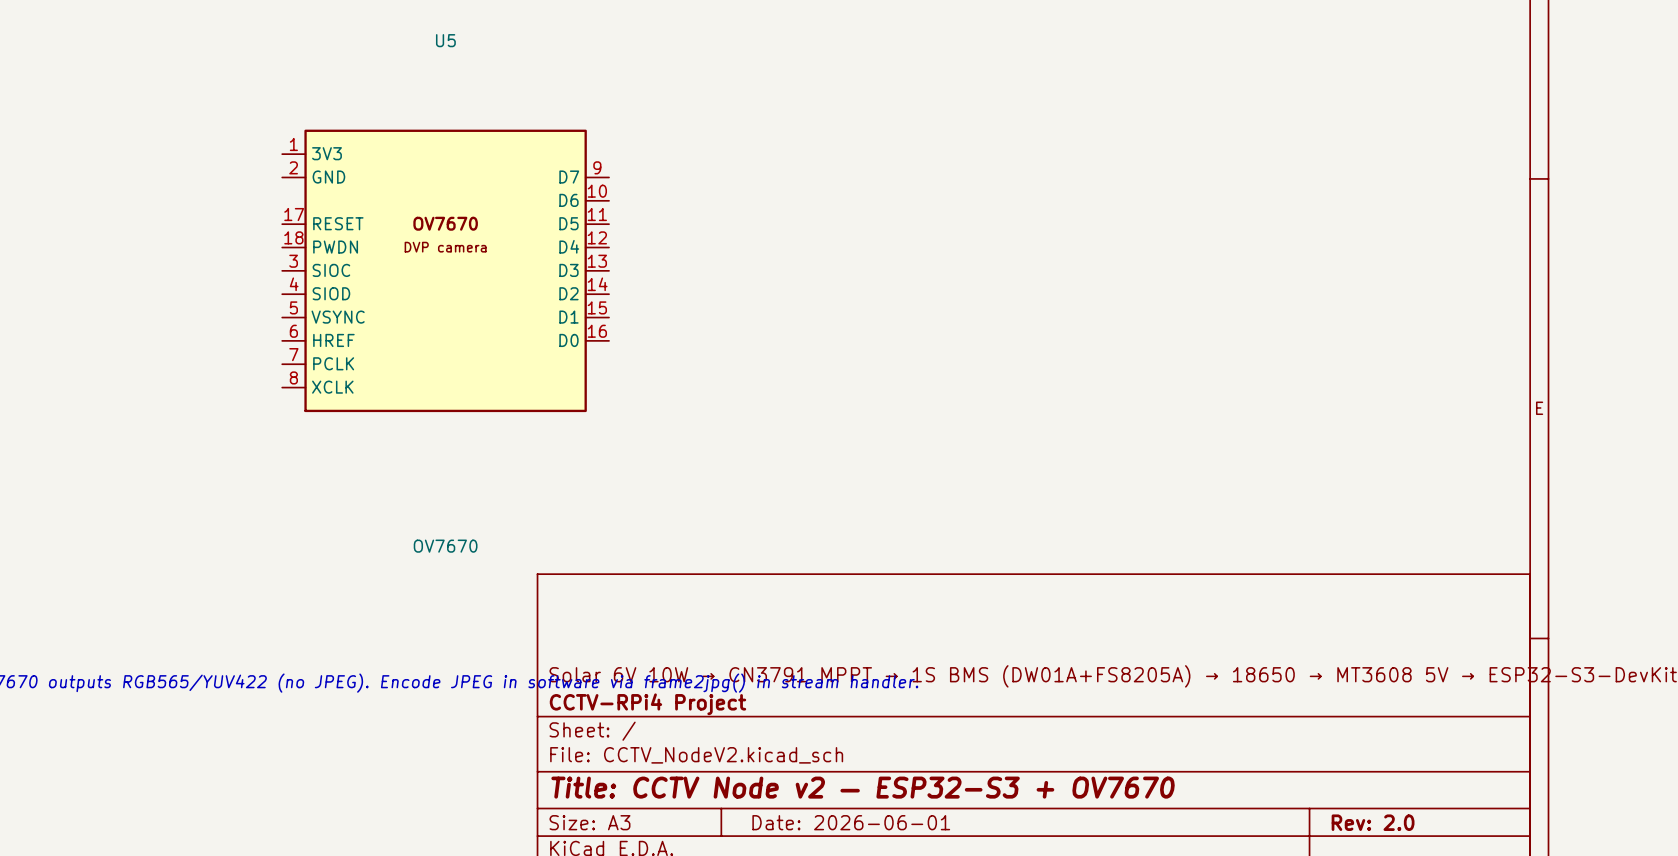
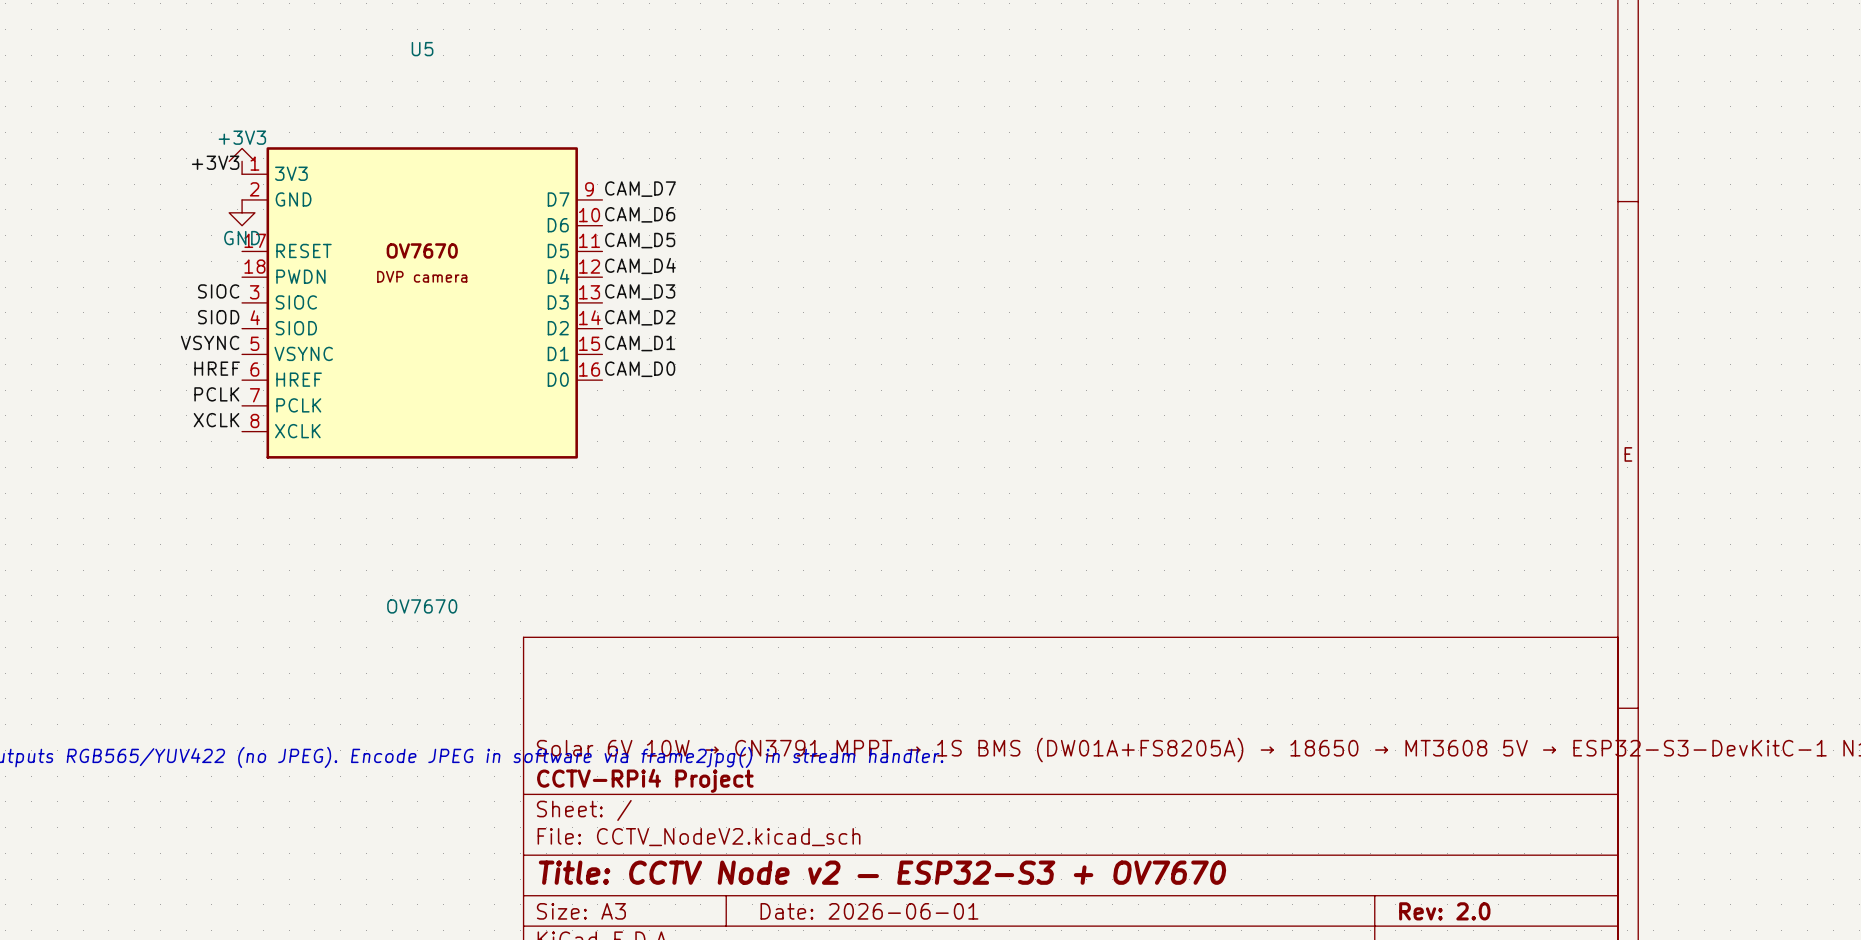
power symbol: none -> +3V3 (242, 161)
label: none -> +3V3 (215, 162)
label: none -> CAM_D7 (640, 189)
power symbol: none -> GND (242, 212)
label: none -> CAM_D6 (640, 214)
label: none -> CAM_D5 (640, 240)
label: none -> CAM_D4 (640, 266)
label: none -> SIOC (218, 291)
label: none -> CAM_D3 (640, 292)
label: none -> SIOD (218, 317)
label: none -> CAM_D2 (640, 317)
label: none -> VSYNC (210, 342)
label: none -> CAM_D1 (640, 343)
label: none -> HREF (217, 368)
label: none -> CAM_D0 (640, 369)
label: none -> PCLK (216, 394)
label: none -> XCLK (216, 420)

